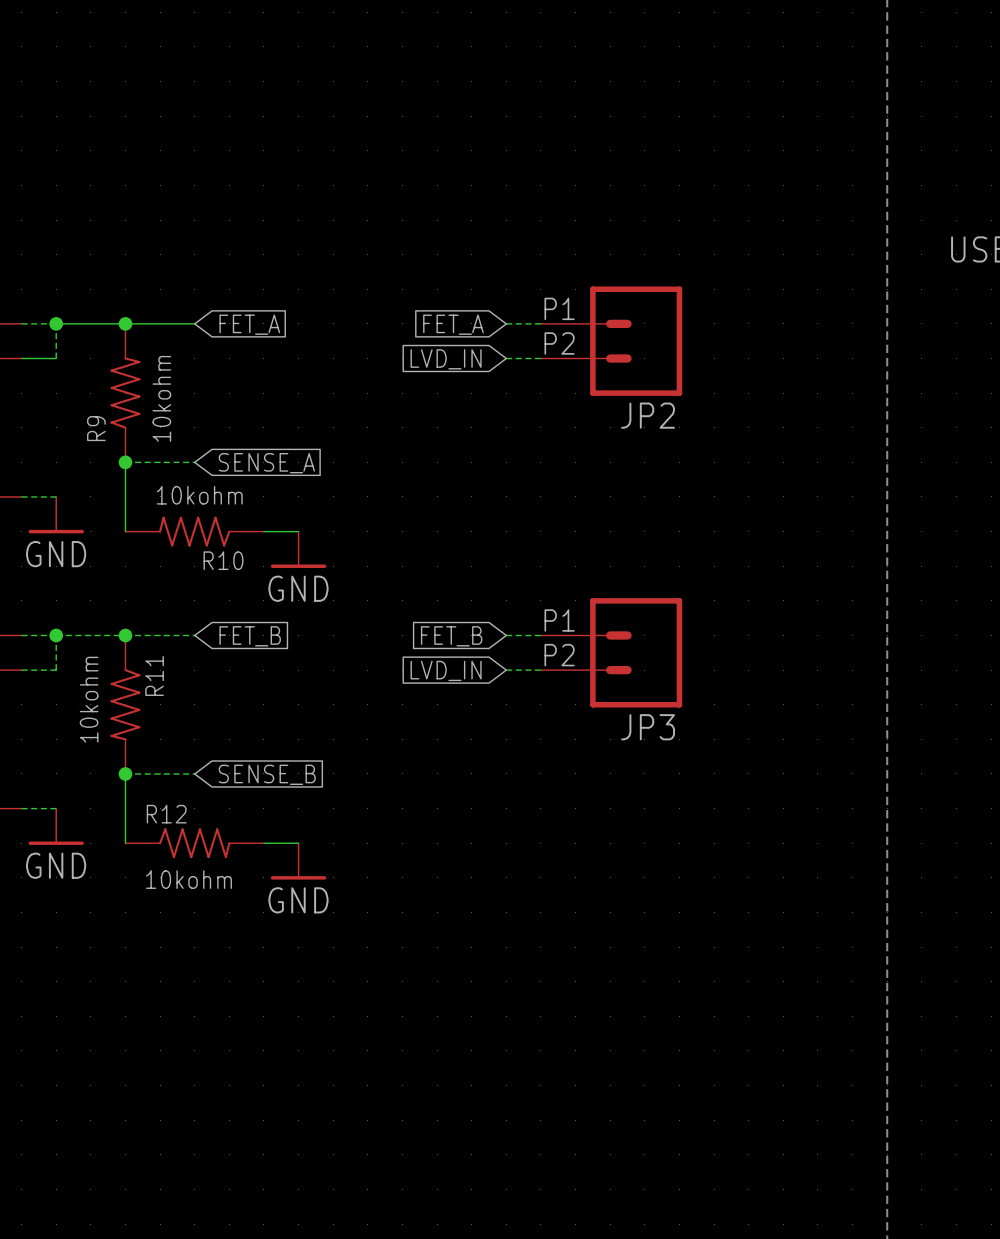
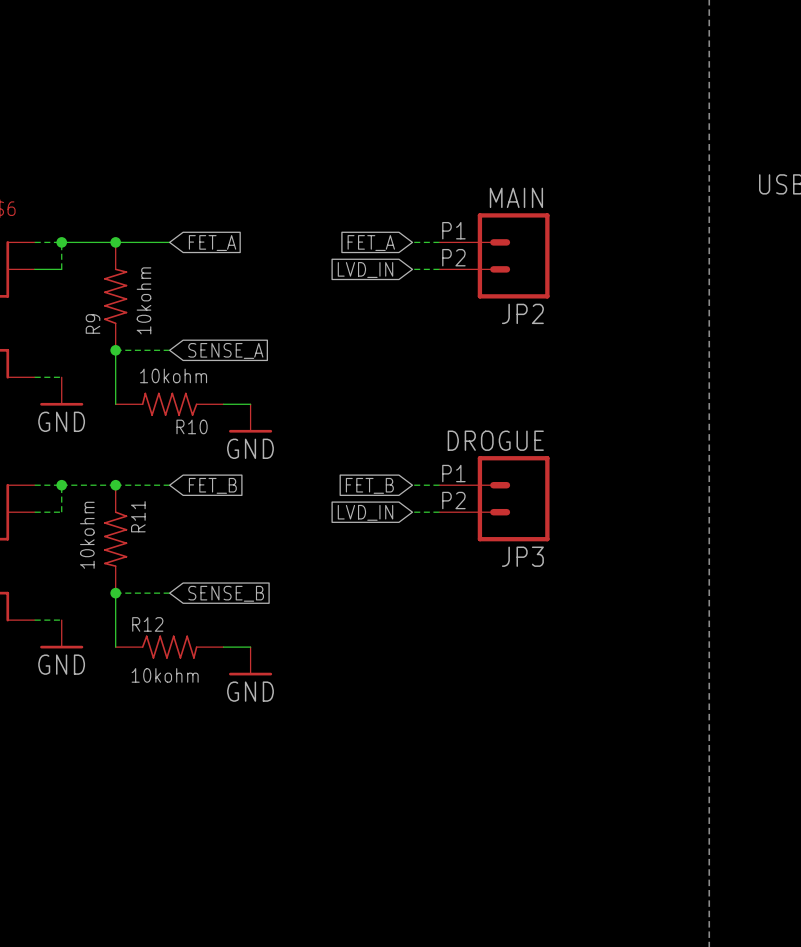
JP2 value: none -> MAIN (516, 197)
JP3 value: none -> DROGUE (495, 440)

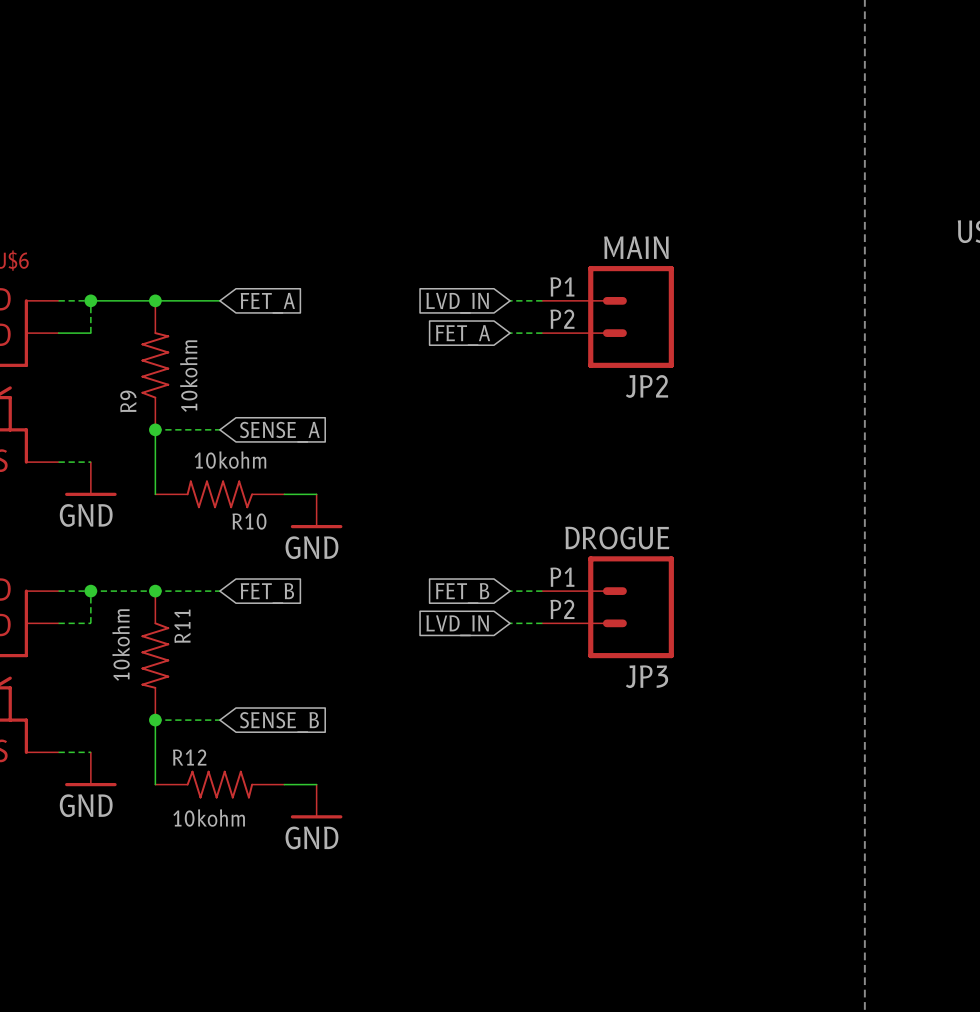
global label: FET_A (371, 243) -> LVD_IN (457, 303)
global label: LVD_IN (365, 270) -> FET_A (463, 335)

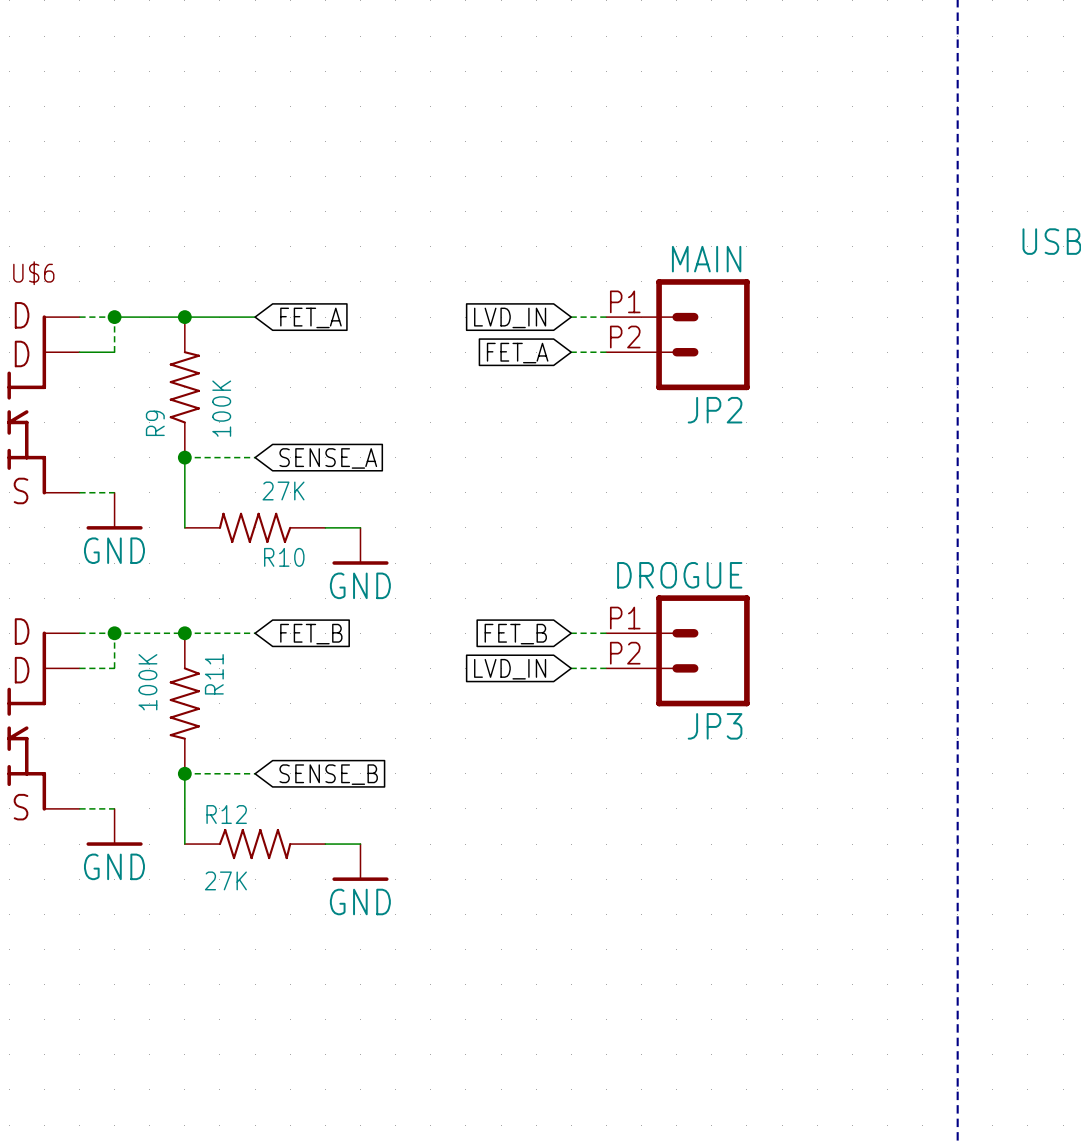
R9 value: 10kohm (188, 376) -> 100K (221, 408)
R10 value: 10kohm (230, 460) -> 27K (283, 490)
R11 value: 10kohm (121, 645) -> 100K (147, 682)
R12 value: 10kohm (209, 818) -> 27K (225, 880)

